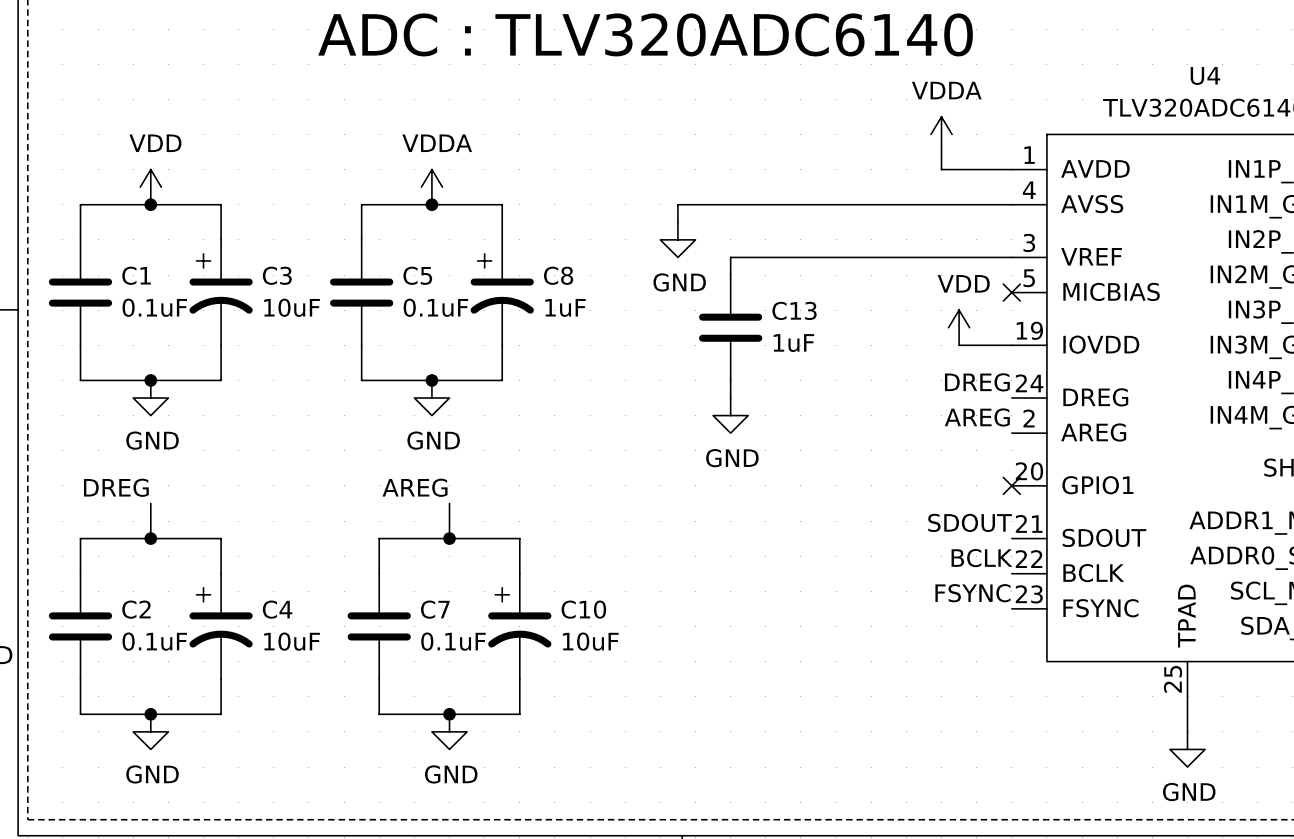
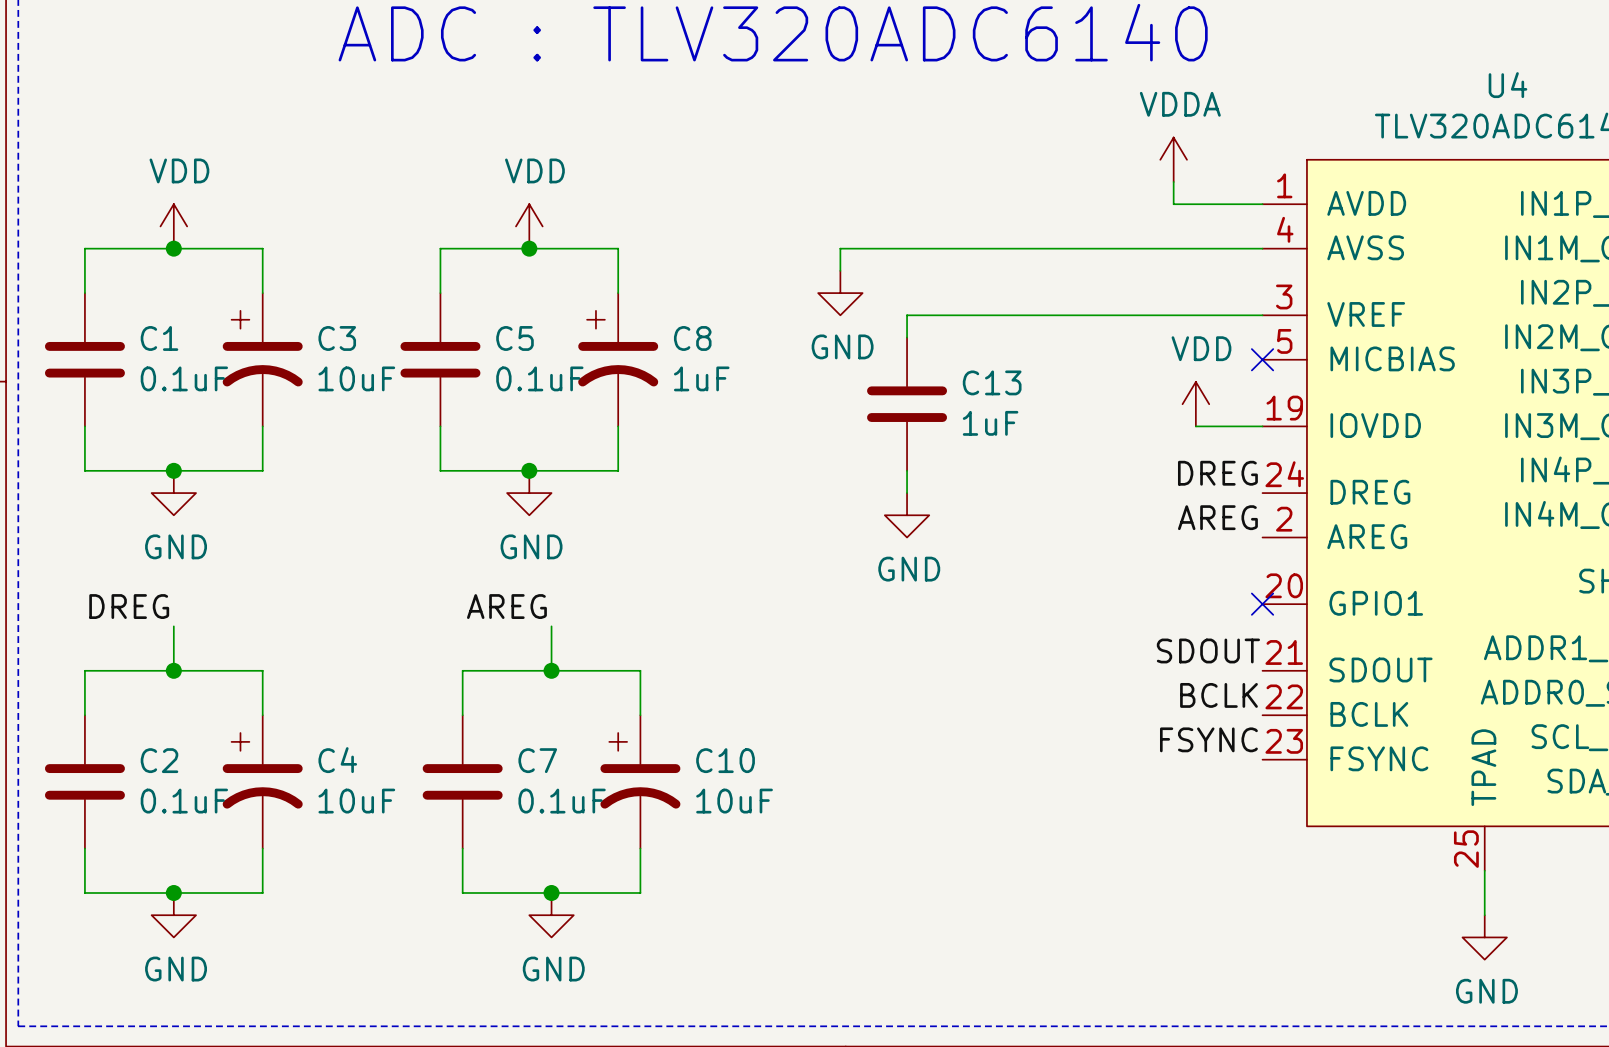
power symbol: VDDA (431, 187) -> VDD (529, 226)

